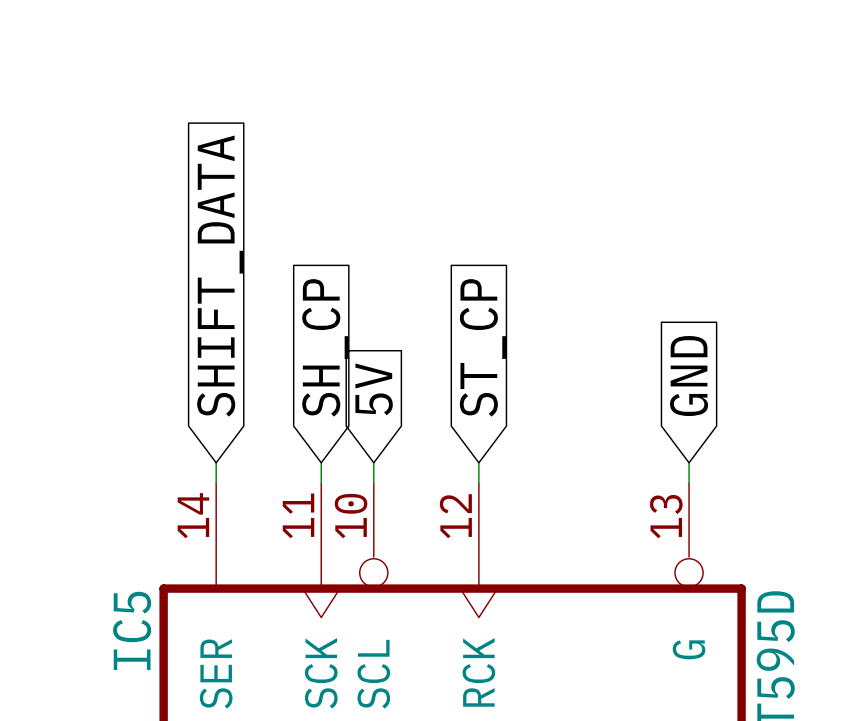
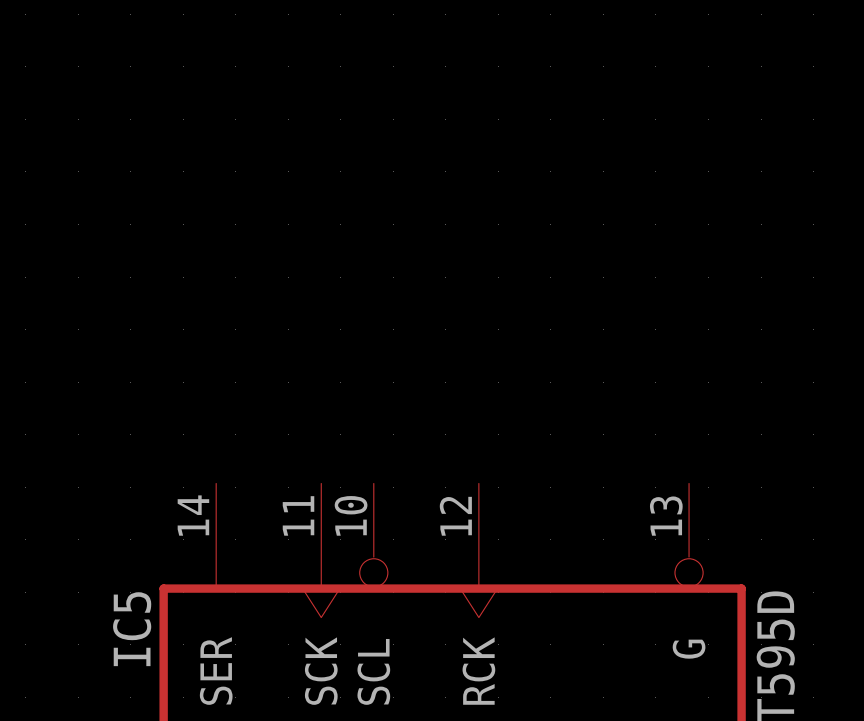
global label: SHIFT_DATA (220, 276) -> none
global label: SH_CP (325, 347) -> none
global label: ST_CP (483, 347) -> none
global label: GND (689, 376) -> none
global label: 5V (374, 389) -> none
wire: (216, 462) (216, 483) -> none
wire: (321, 462) (321, 483) -> none
wire: (373, 462) (373, 483) -> none
wire: (478, 462) (478, 483) -> none
wire: (689, 462) (689, 483) -> none

